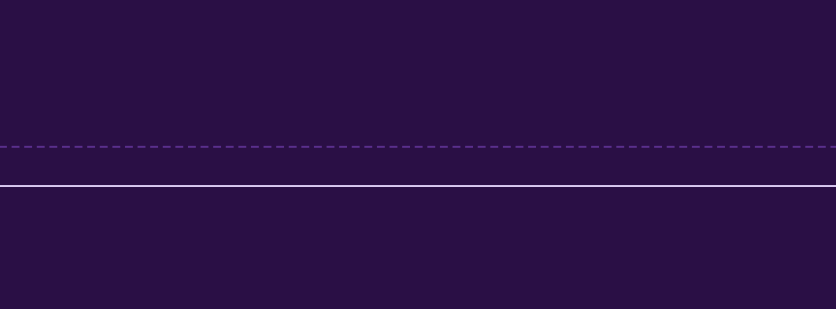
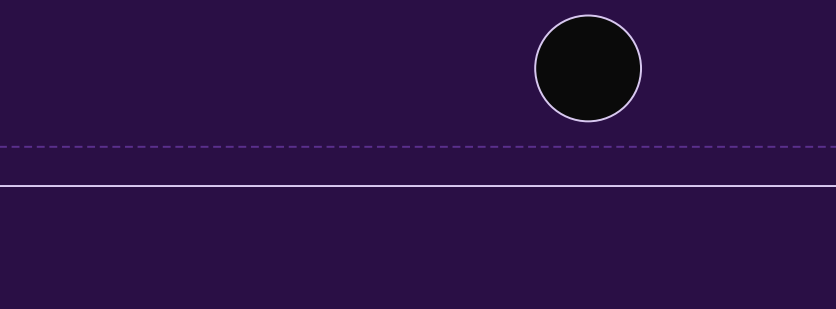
part: none -> (588, 68)

